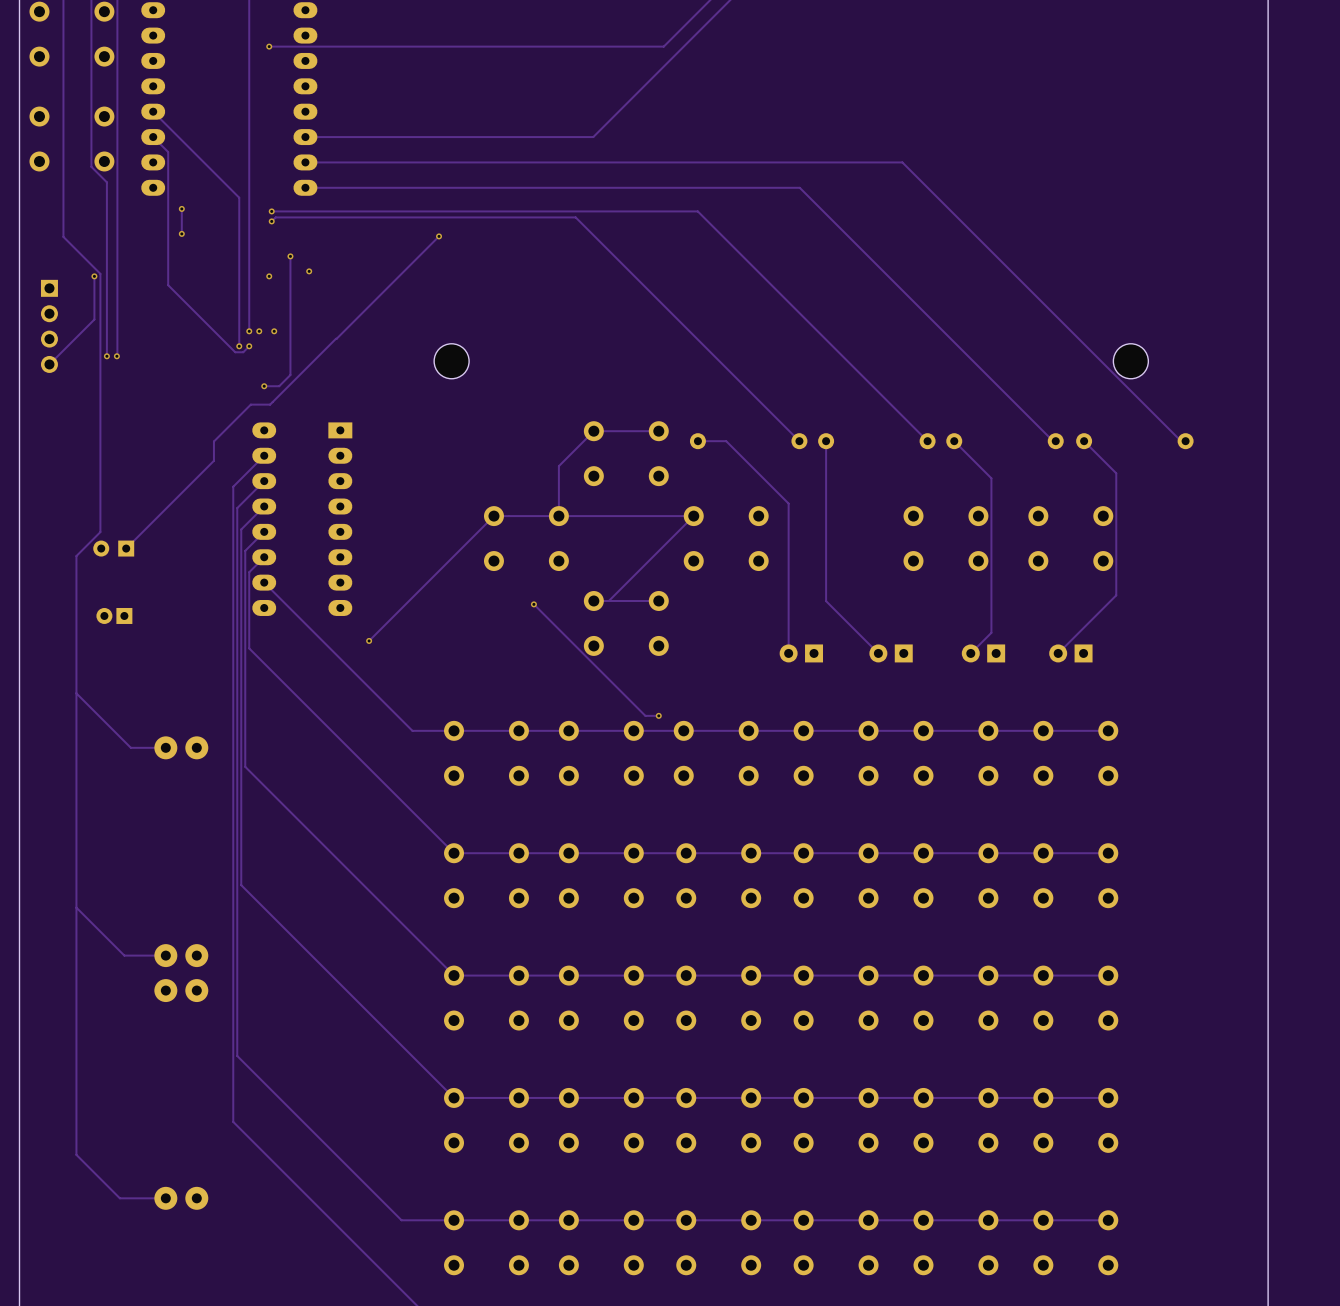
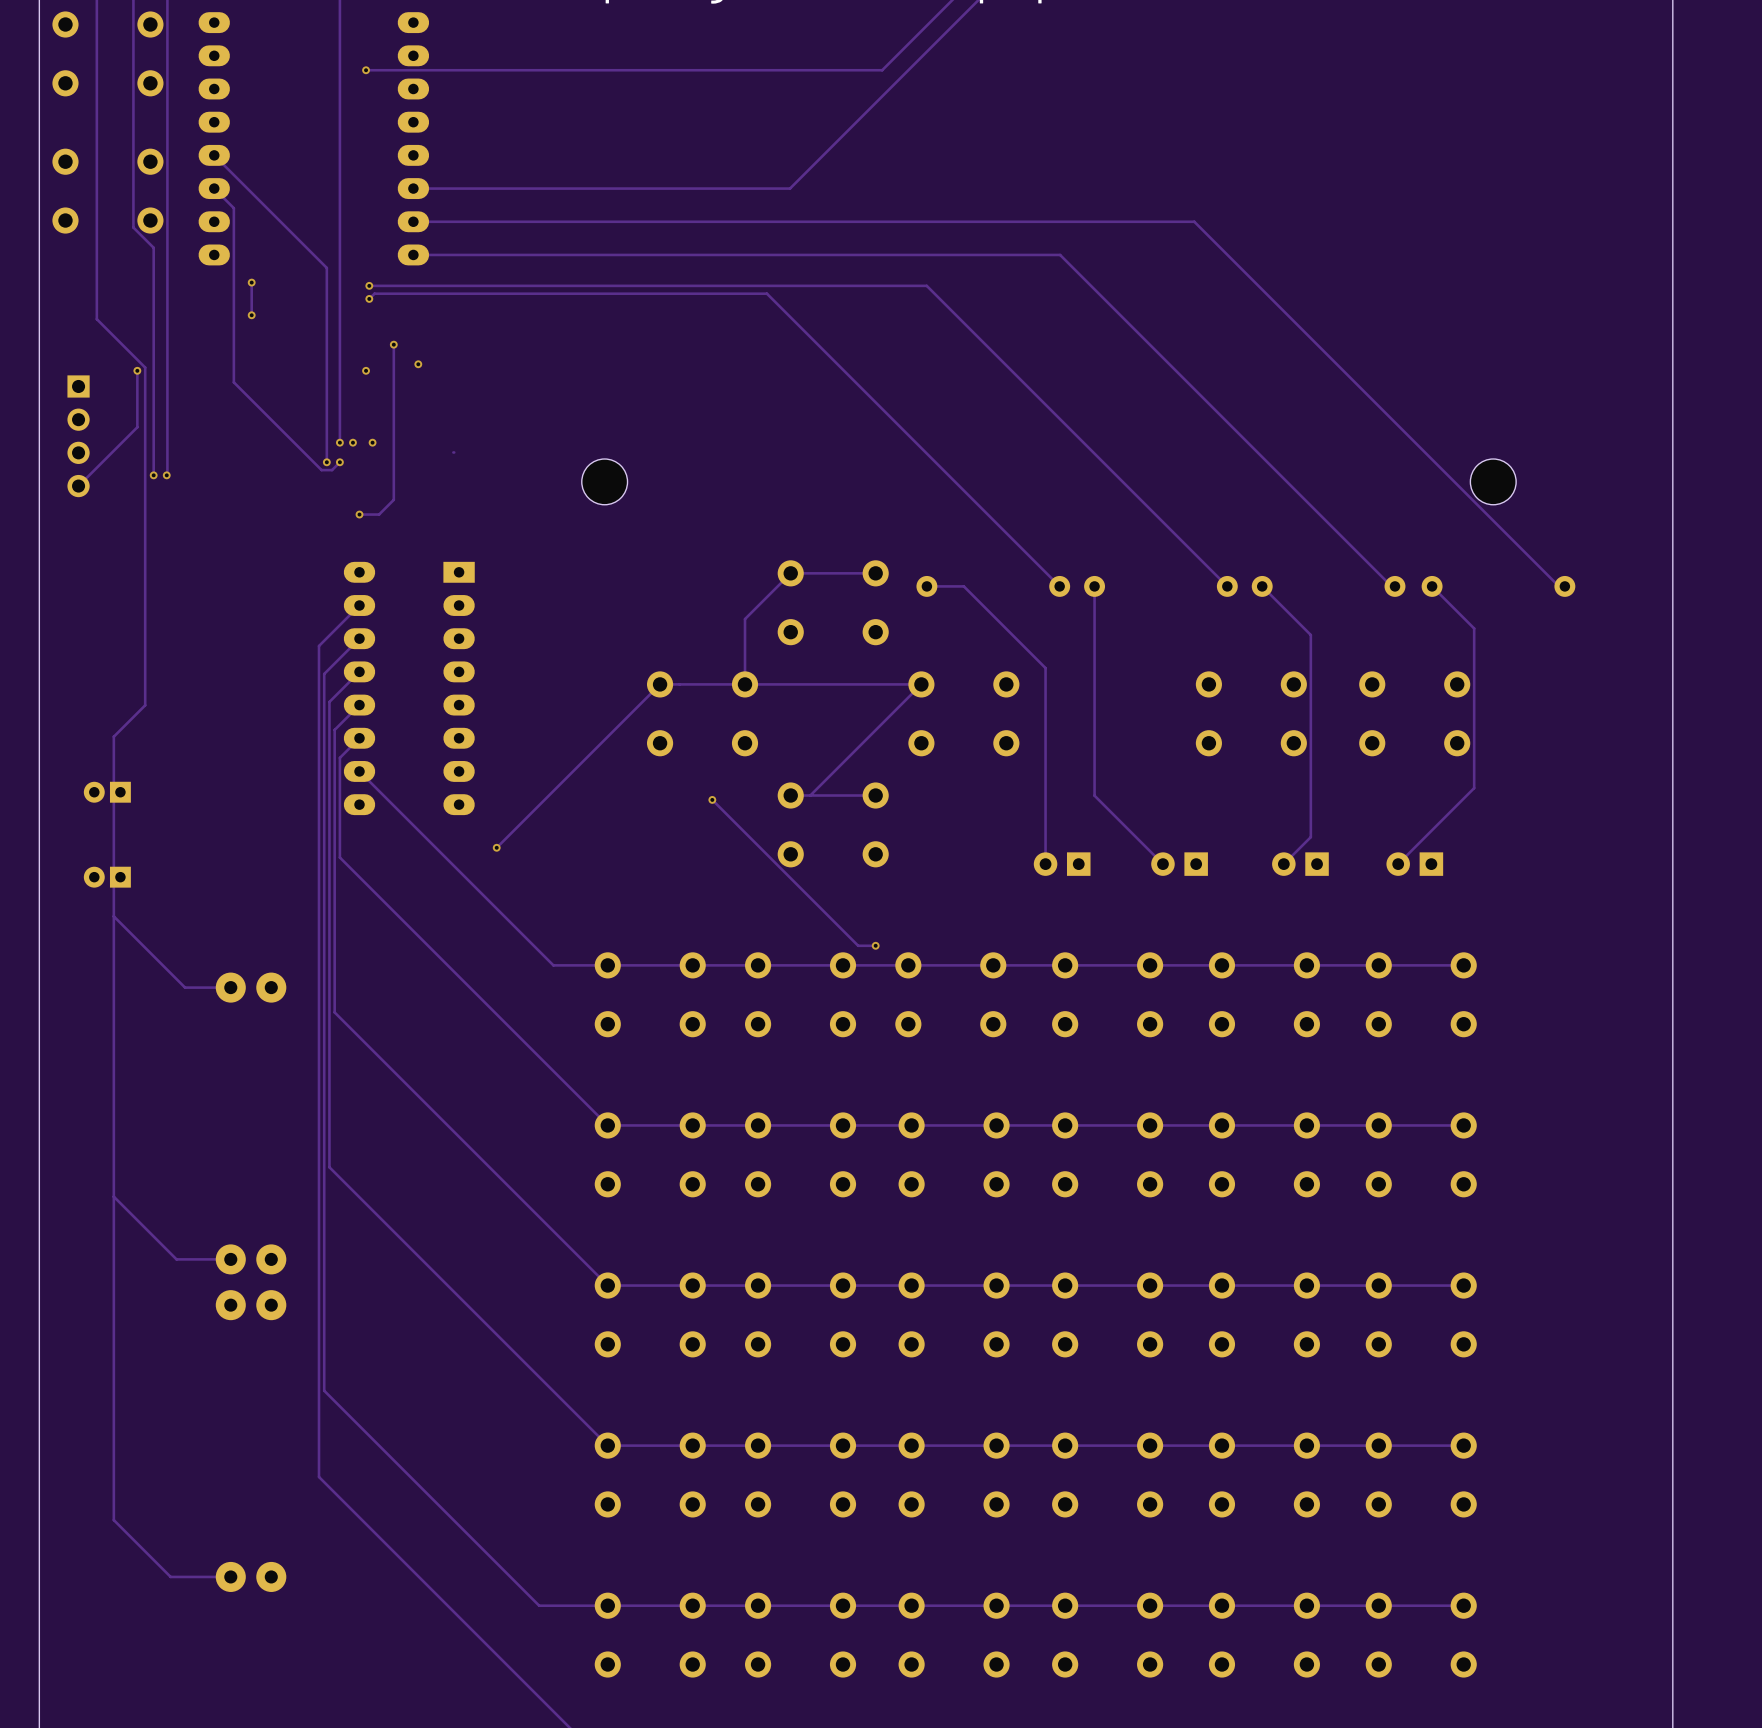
track: (439, 236) (336, 338) -> none
via: (439, 236) -> none
track: (335, 338) (270, 404) (250, 404) (213, 441) (213, 460) (126, 548) -> none
part: (113, 548) -> none
part: none -> (107, 792)
part: (114, 615) -> none
part: none -> (107, 877)

